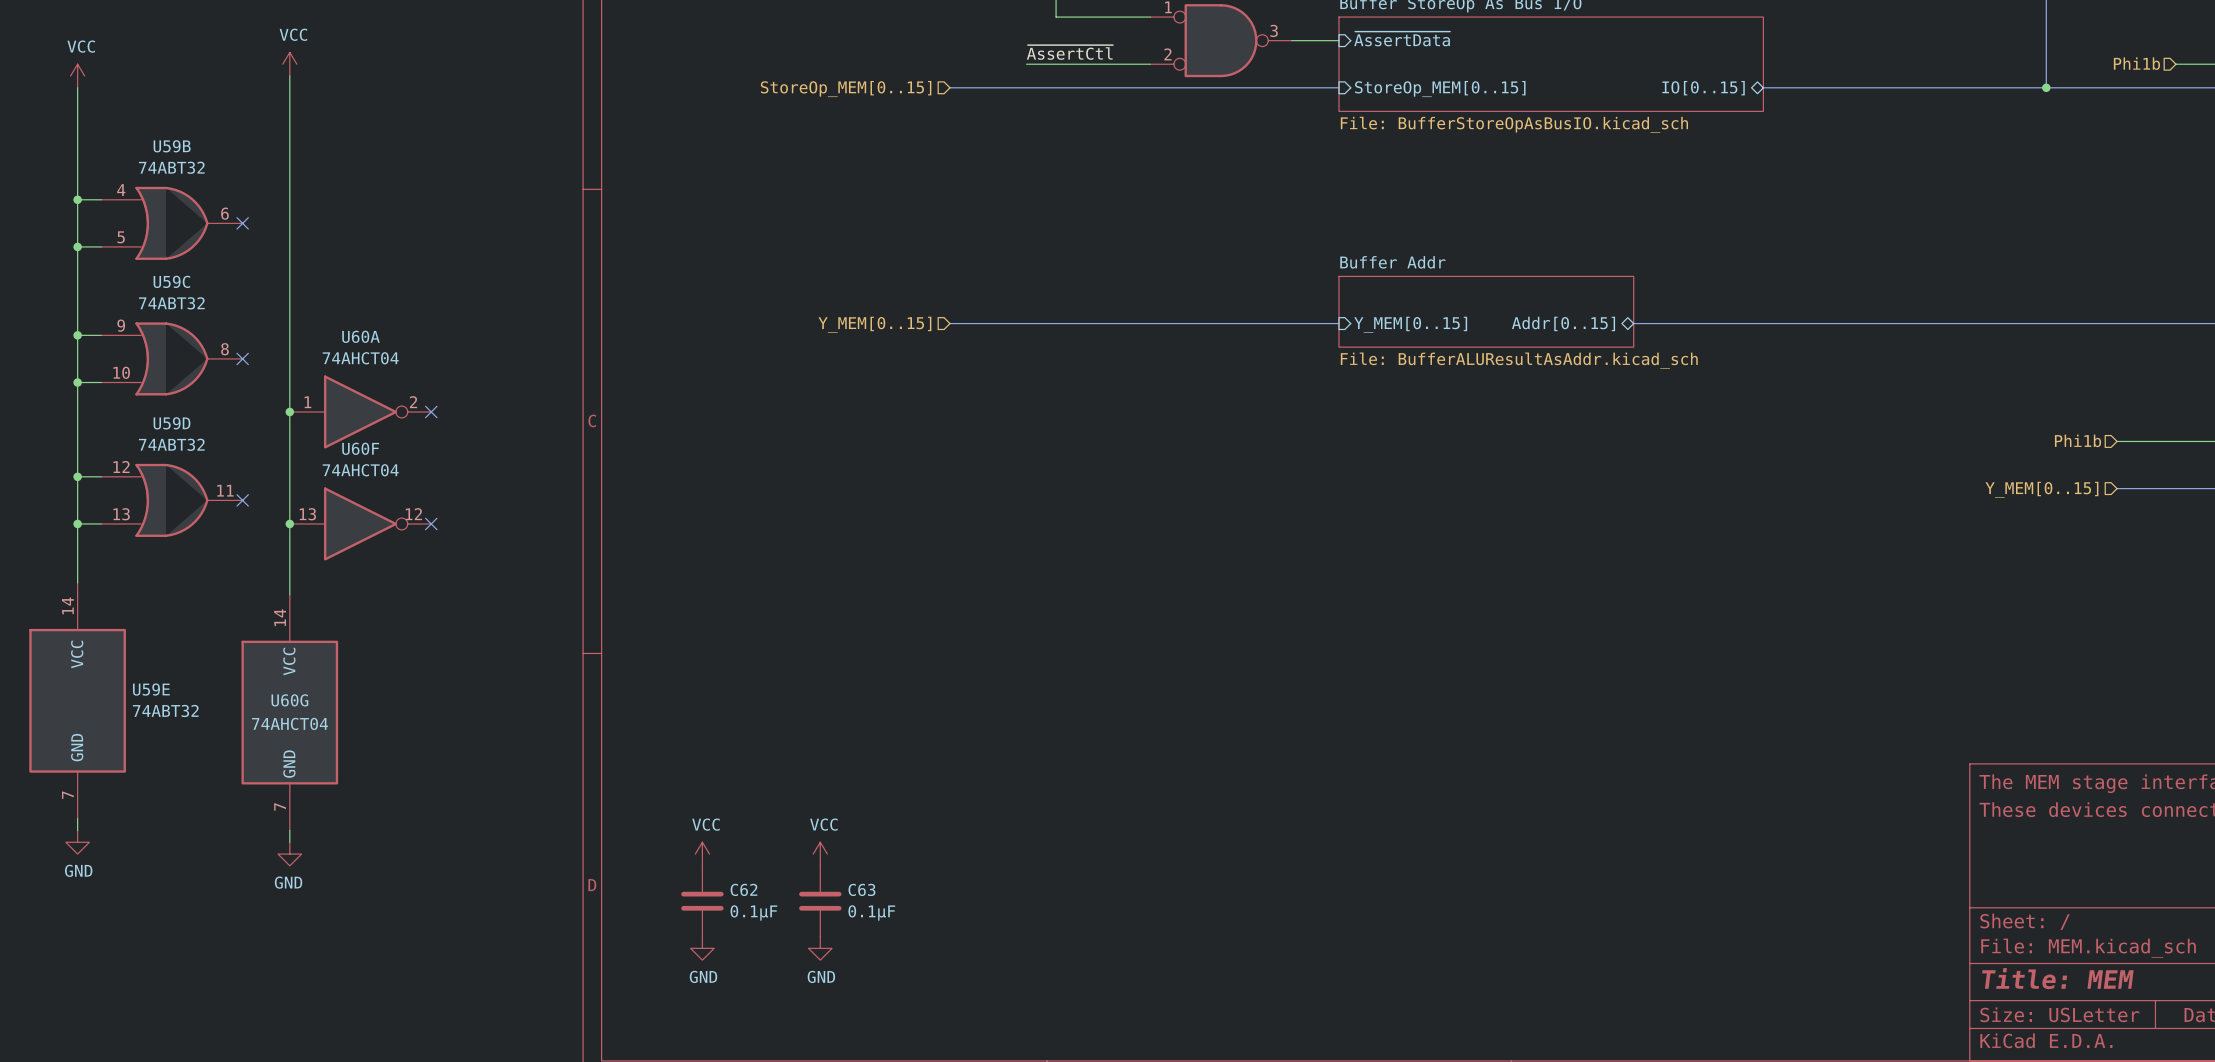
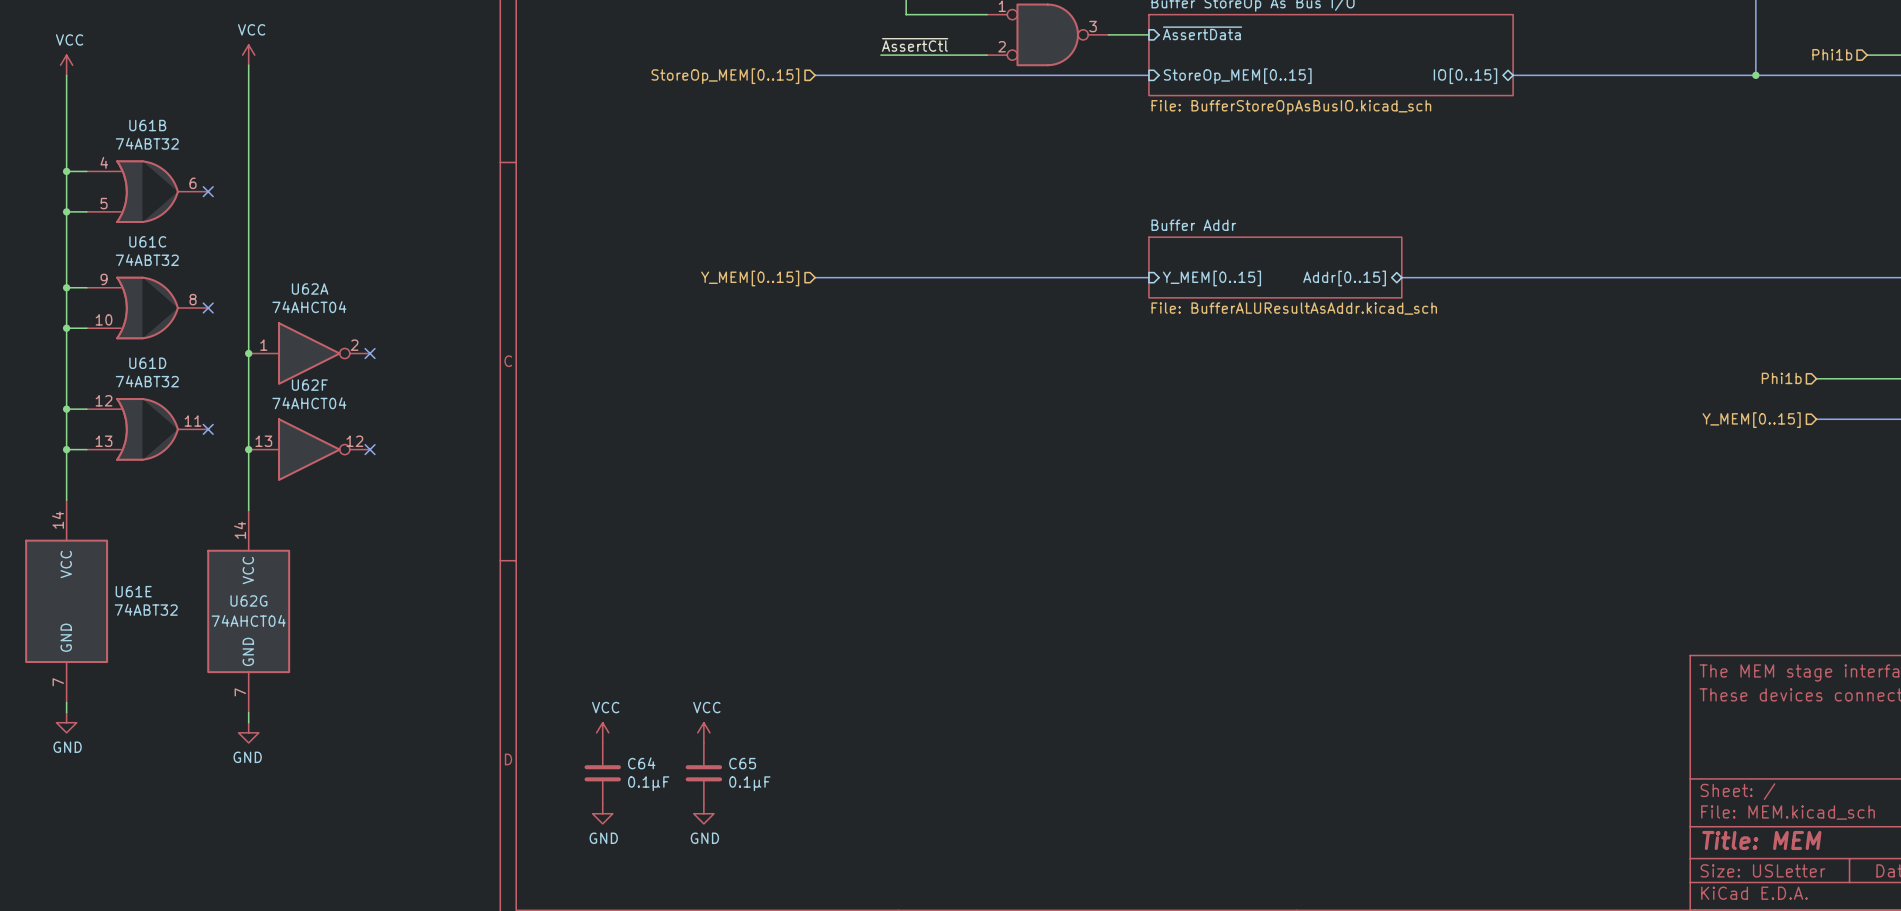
U59B name: U59B (172, 146) -> U61B (147, 125)
U59C name: U59C (171, 281) -> U61C (147, 241)
U60A name: U60A (360, 336) -> U62A (310, 289)
U59D name: U59D (172, 423) -> U61D (147, 363)
U60F name: U60F (360, 448) -> U62F (309, 385)
U59E name: U59E (151, 689) -> U61E (133, 591)
U60G name: U60G (289, 700) -> U62G (248, 600)
C62 name: C62 (743, 889) -> C64 (641, 763)
C63 name: C63 (861, 889) -> C65 (742, 763)

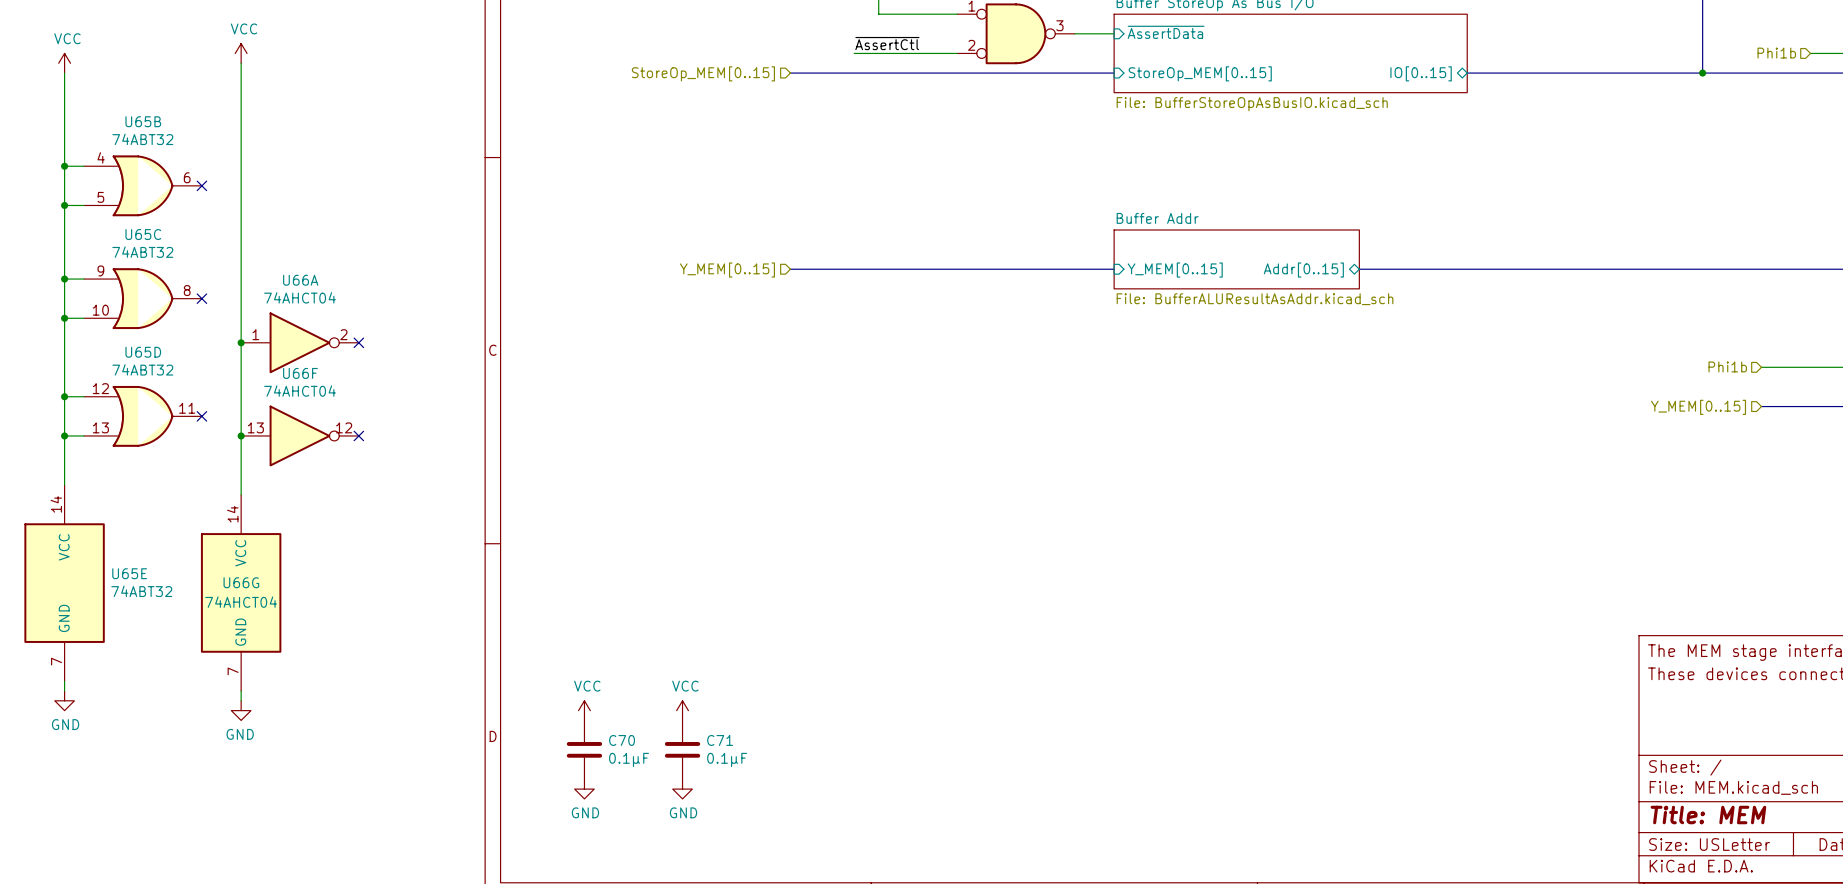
U61B name: U61B (147, 125) -> U65B (143, 121)
U61C name: U61C (147, 241) -> U65C (143, 234)
U62A name: U62A (310, 289) -> U66A (300, 280)
U61D name: U61D (147, 363) -> U65D (143, 352)
U62F name: U62F (309, 385) -> U66F (300, 373)
U61E name: U61E (133, 591) -> U65E (129, 573)
U62G name: U62G (248, 600) -> U66G (241, 582)
C64 name: C64 (641, 763) -> C70 (622, 740)
C65 name: C65 (742, 763) -> C71 (720, 740)

